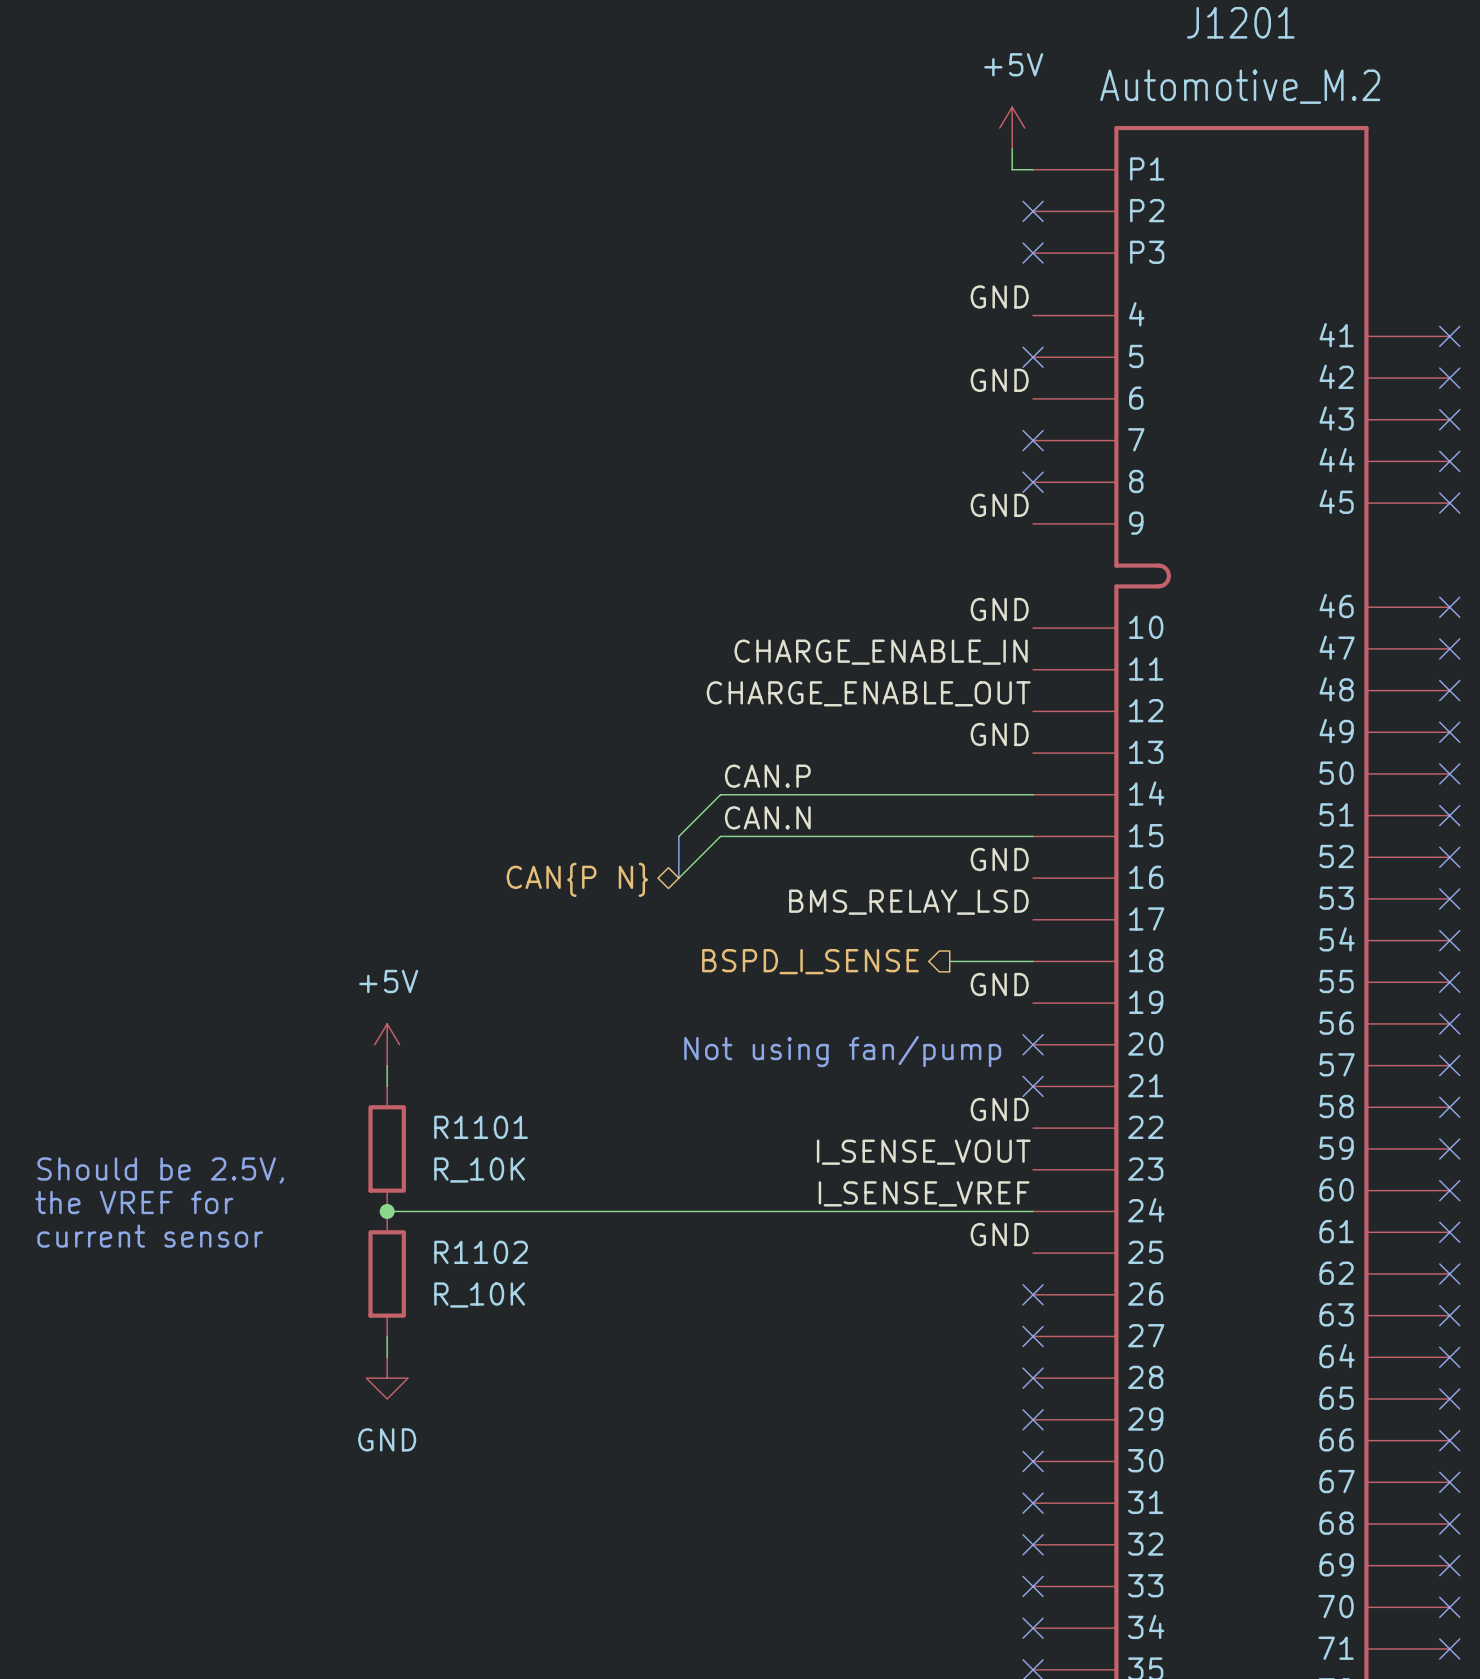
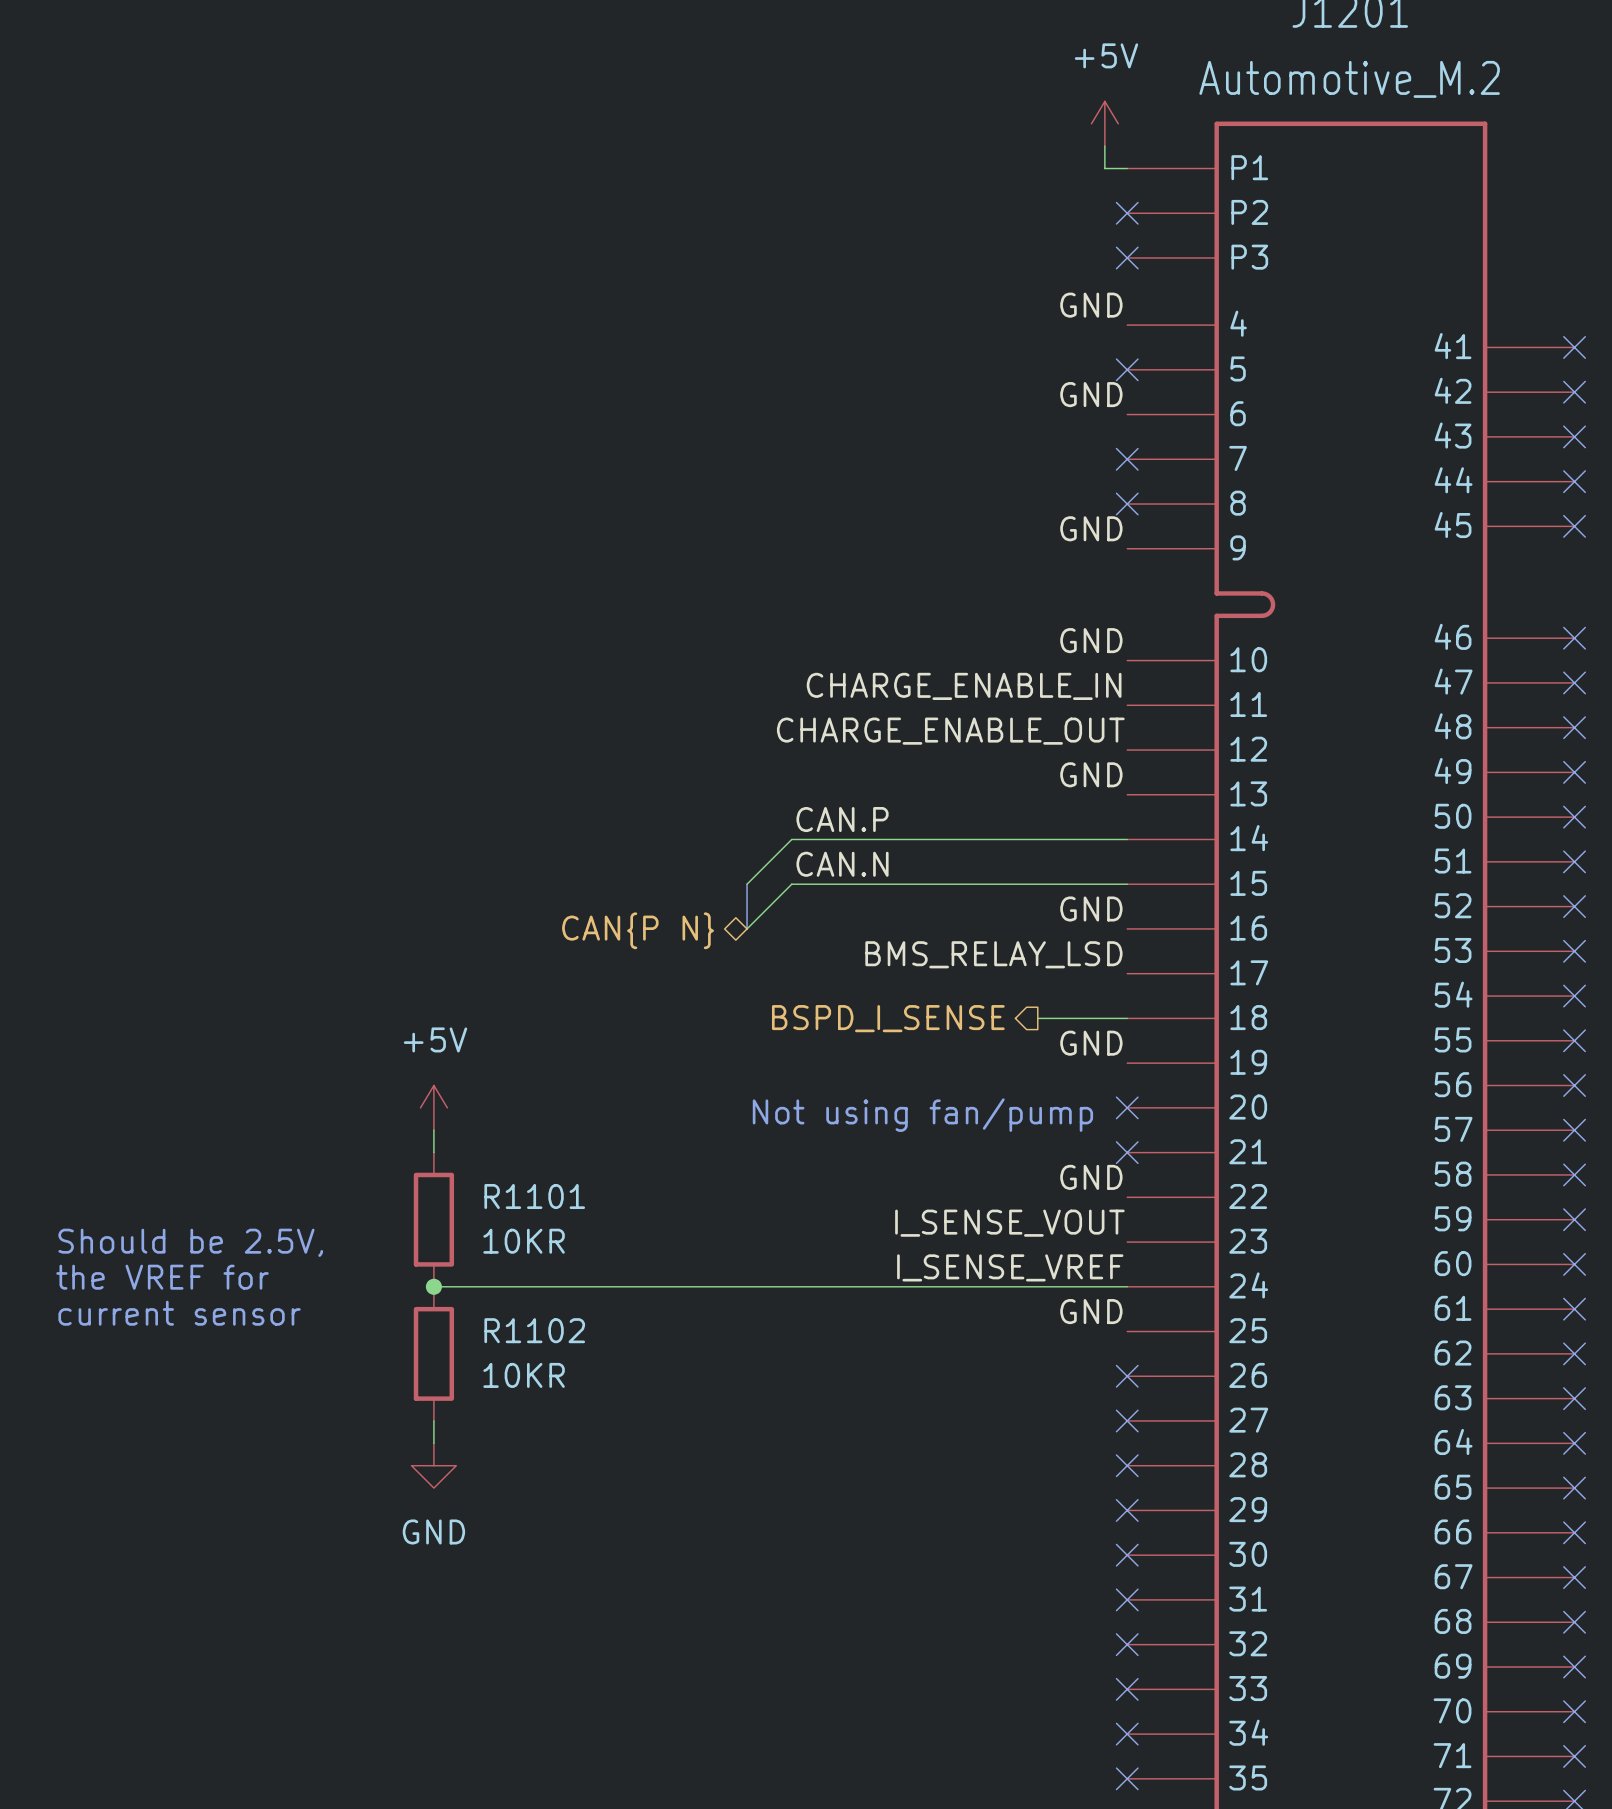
R1101 value: R_10K (479, 1170) -> 10KR (524, 1241)
R1102 value: R_10K (479, 1295) -> 10KR (524, 1375)

